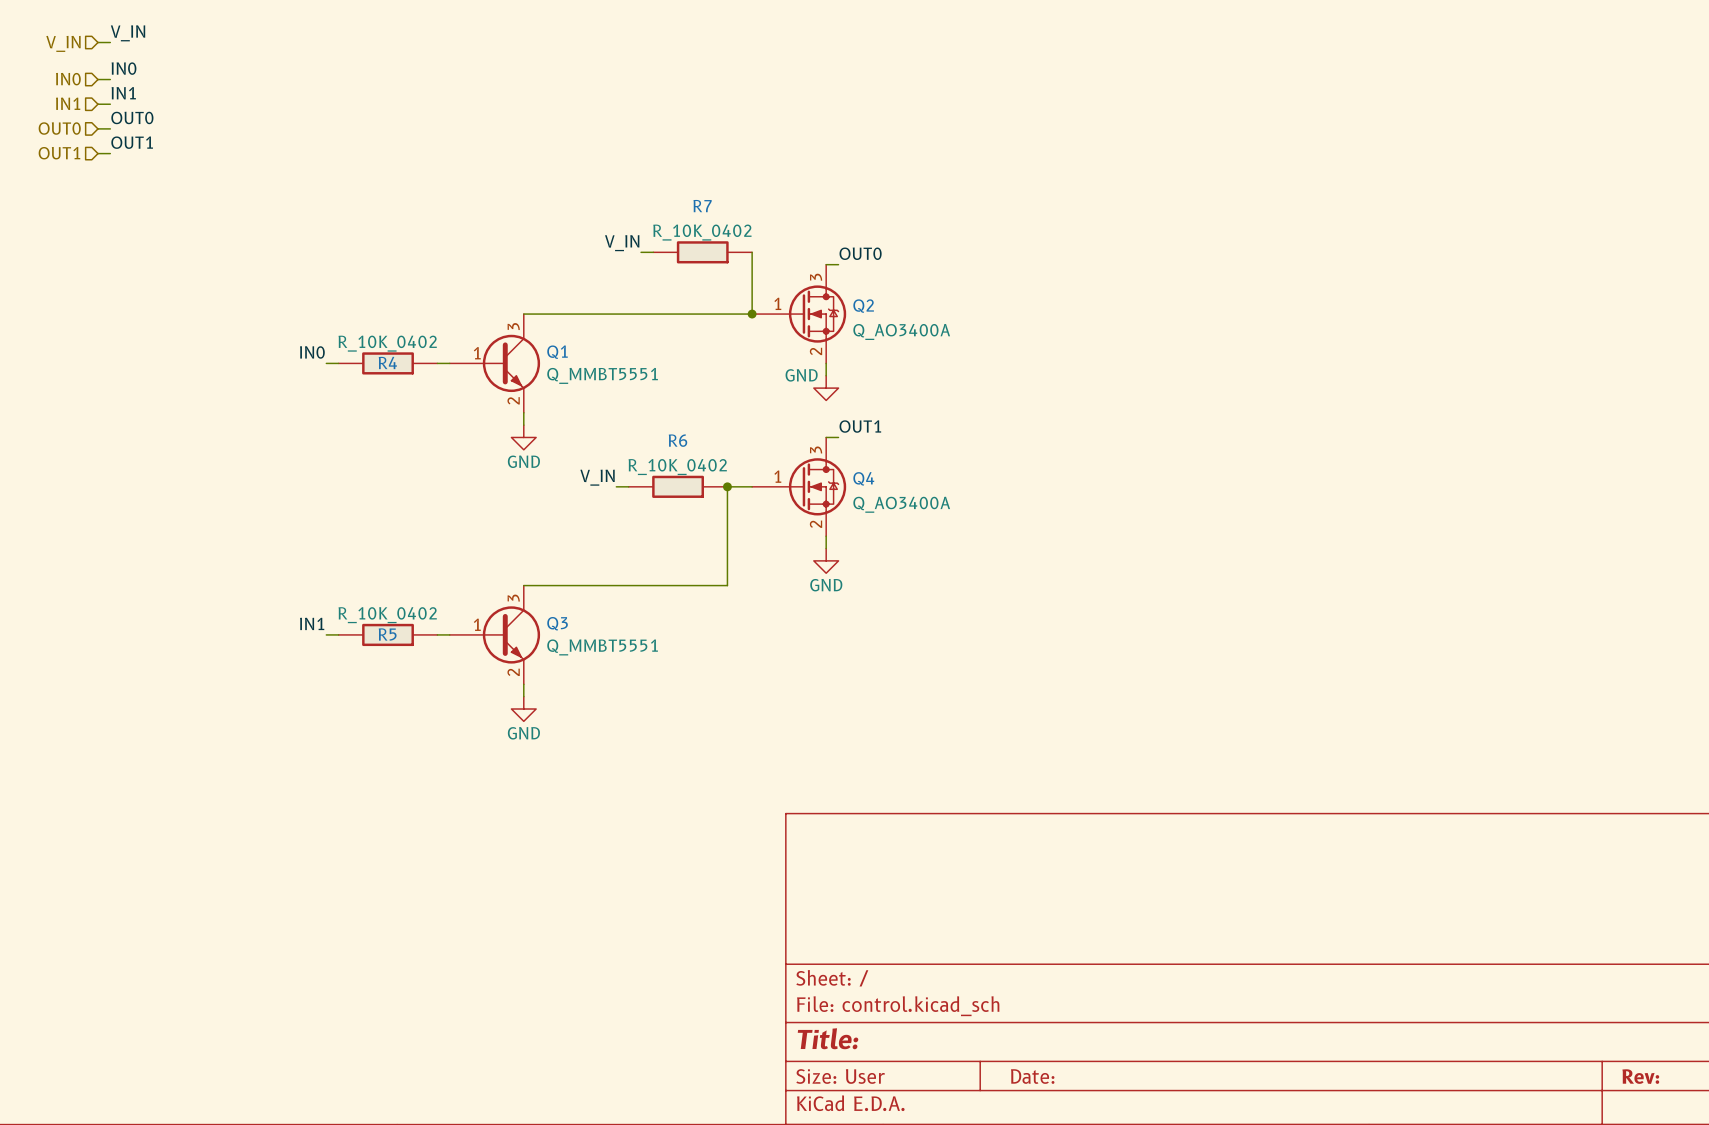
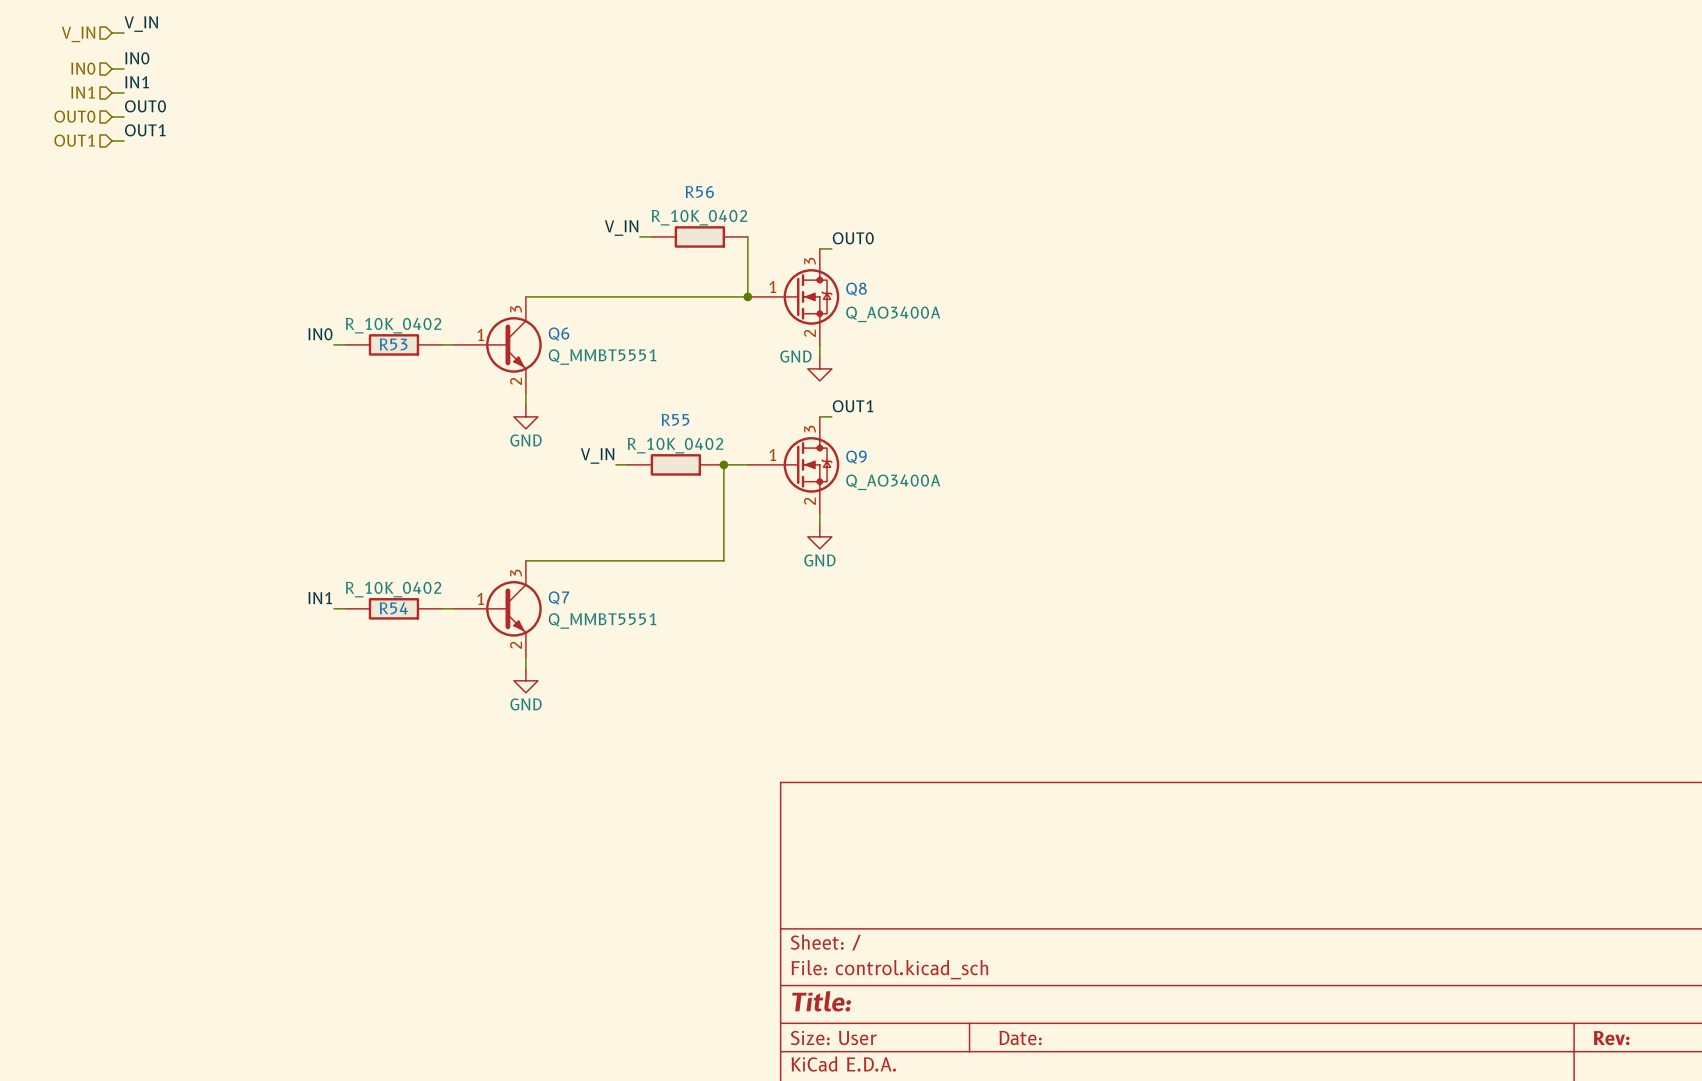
R7 name: R7 (702, 206) -> R56 (699, 192)
Q2 name: Q2 (863, 306) -> Q8 (856, 289)
Q1 name: Q1 (557, 352) -> Q6 (559, 334)
R4 name: R4 (387, 362) -> R53 (393, 344)
R6 name: R6 (677, 440) -> R55 (675, 419)
Q4 name: Q4 (863, 478) -> Q9 (856, 457)
Q3 name: Q3 (557, 623) -> Q7 (558, 597)
R5 name: R5 (387, 634) -> R54 (393, 608)

